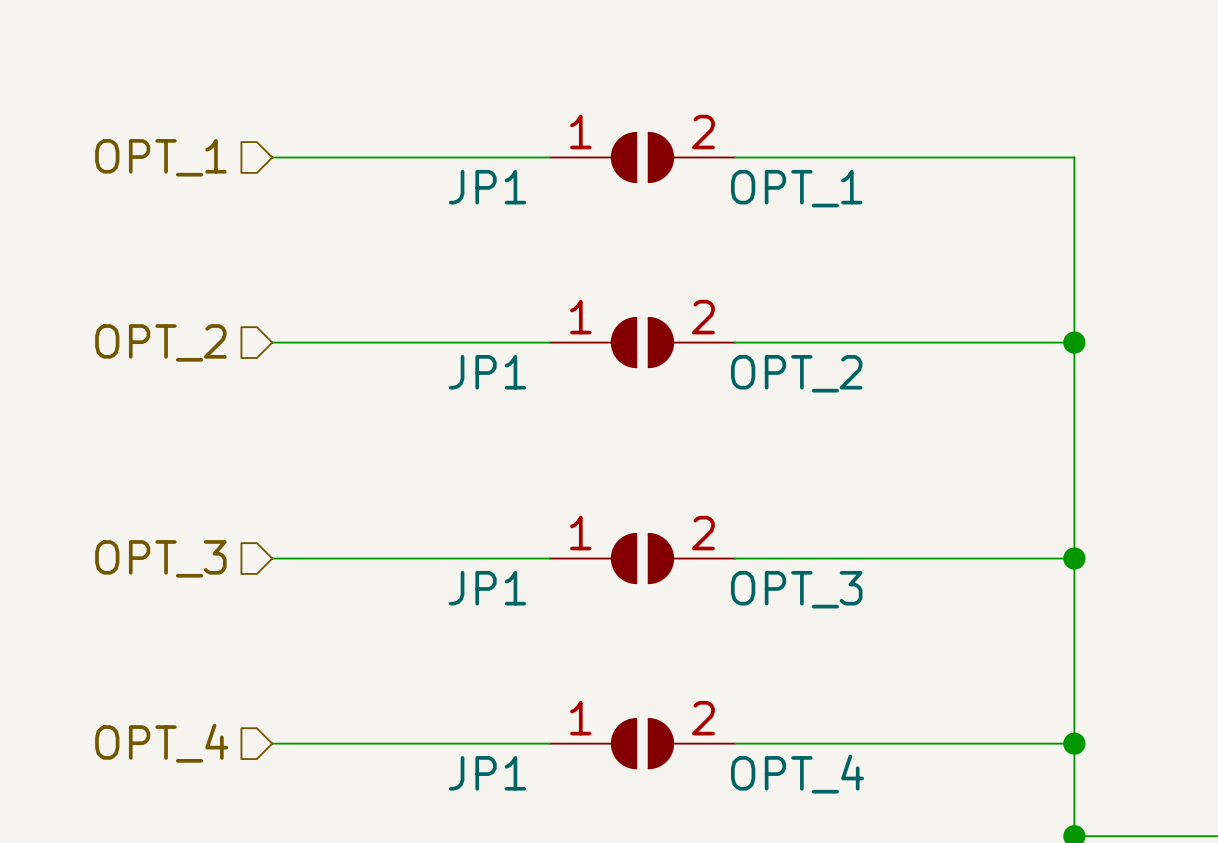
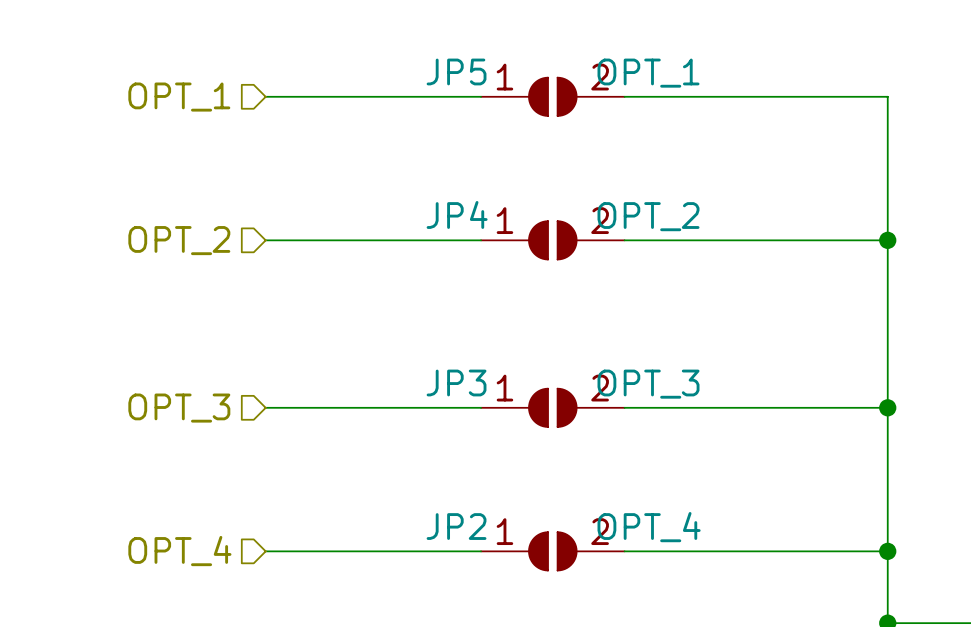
JP1 name: JP1 (487, 187) -> JP5 (456, 71)
JP1 value position: OPT_1 (796, 188) -> OPT_1 (648, 73)
JP1 name: JP1 (487, 372) -> JP4 (457, 214)
JP1 value position: OPT_2 (796, 373) -> OPT_2 (648, 216)
JP1 name: JP1 (487, 588) -> JP3 (456, 382)
JP1 value position: OPT_3 (796, 589) -> OPT_3 (648, 384)
JP1 name: JP1 (487, 773) -> JP2 (456, 526)
JP1 value position: OPT_4 (797, 774) -> OPT_4 (649, 527)

